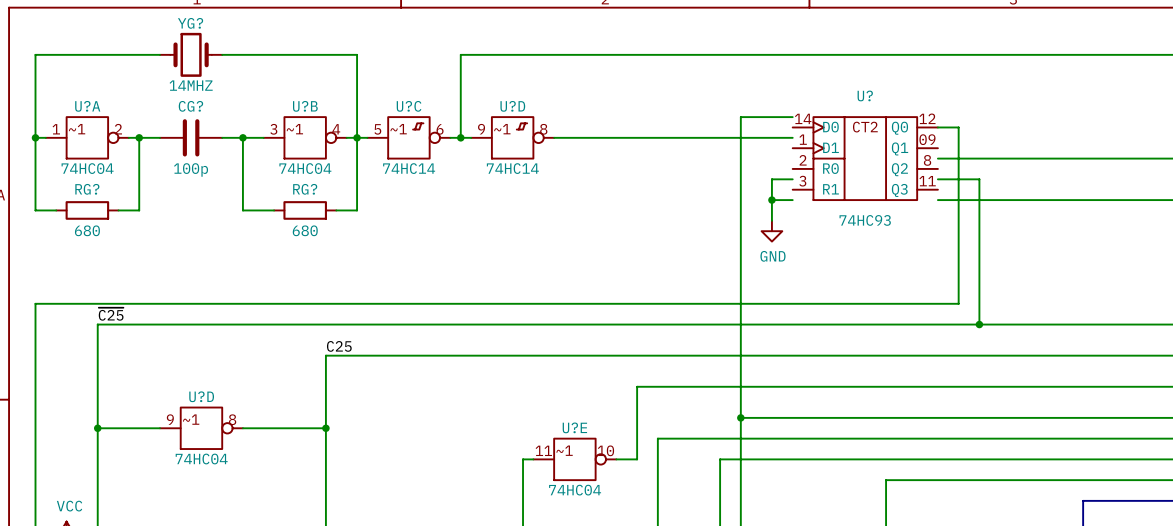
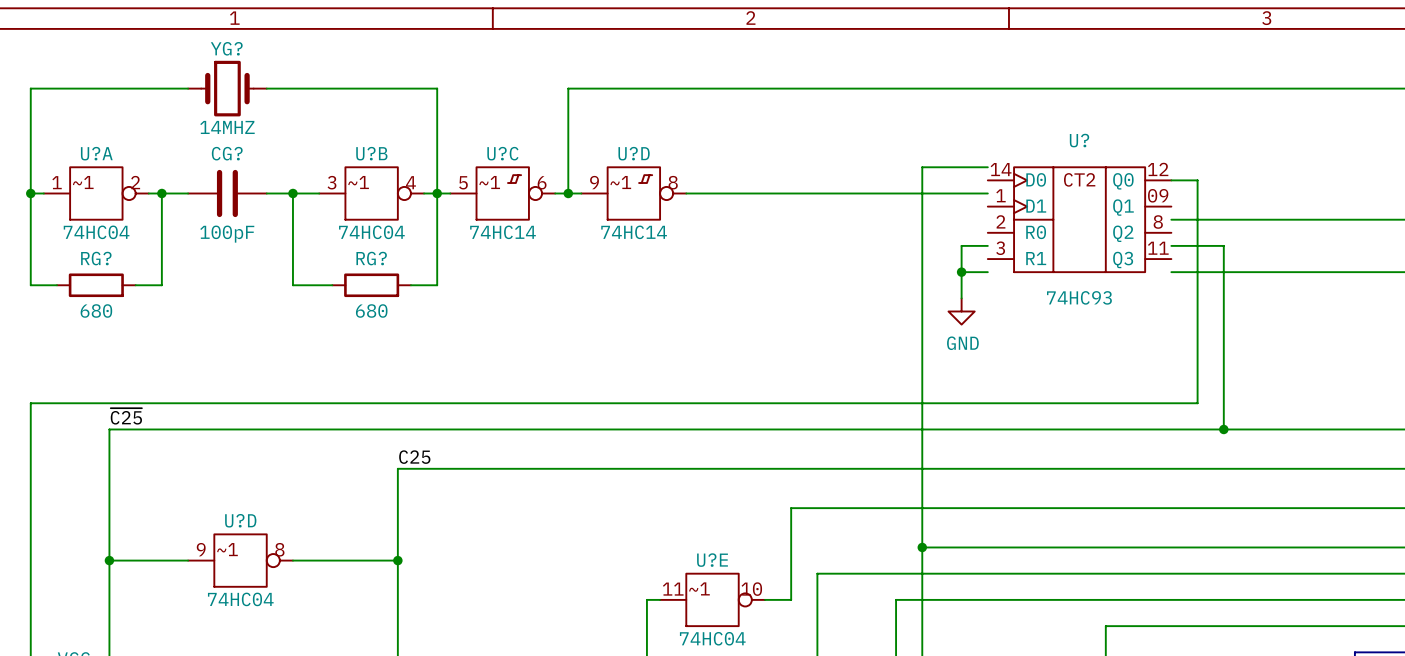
CG? value: 100p (191, 169) -> 100pF (227, 234)

